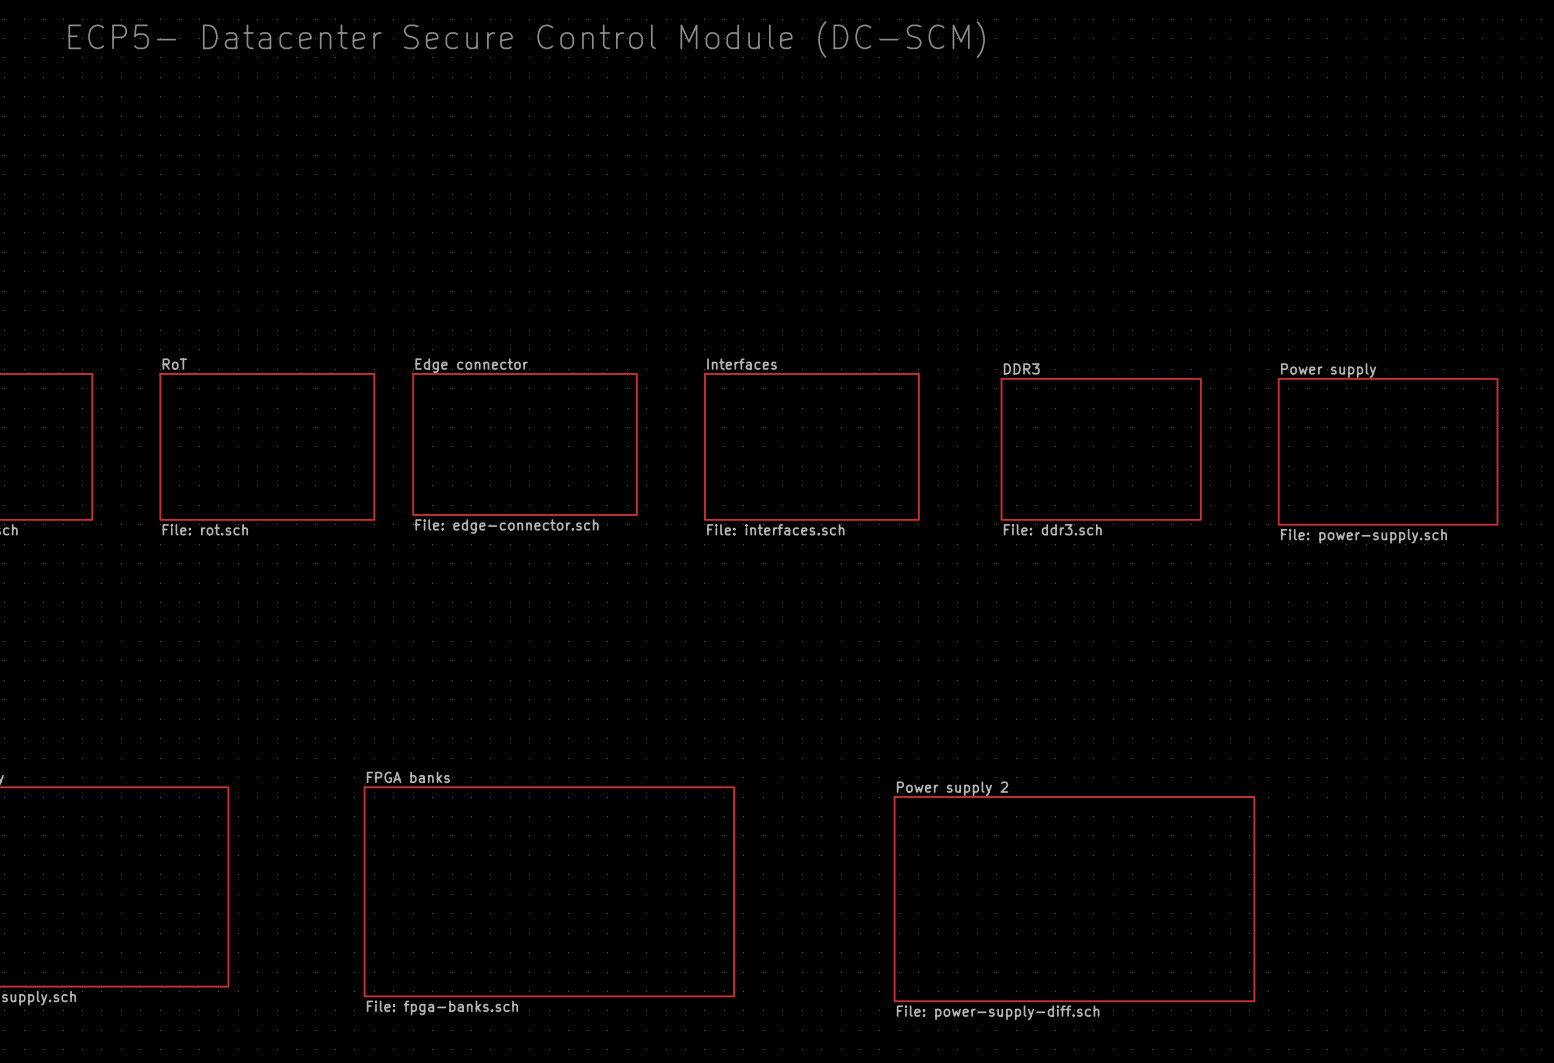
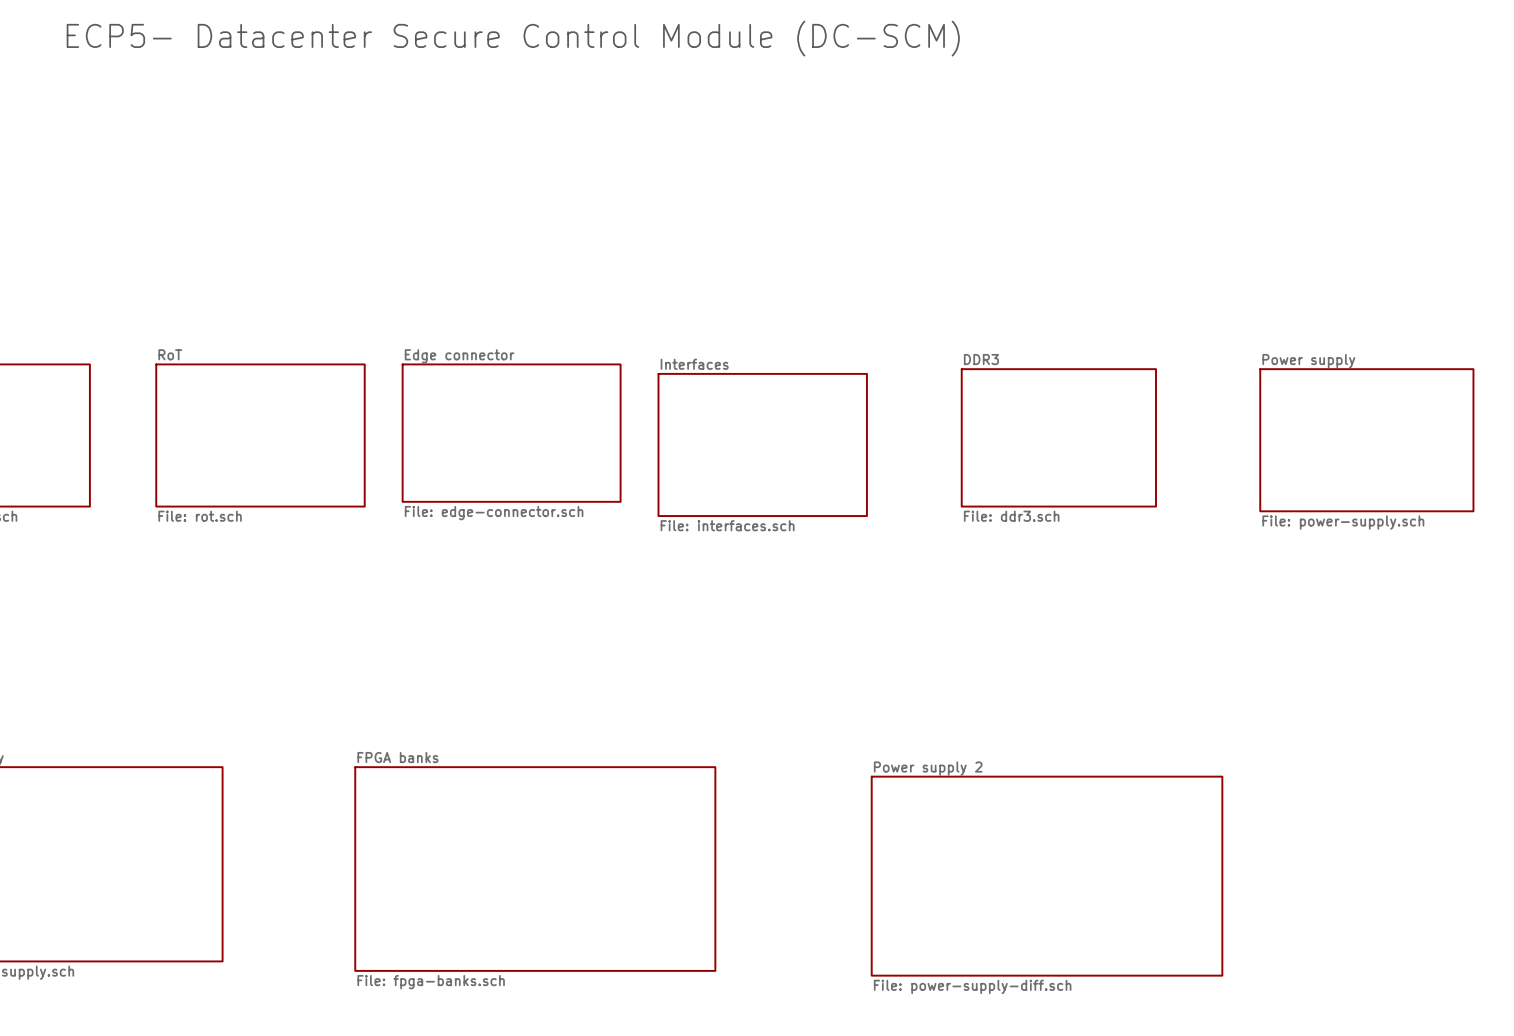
sheet Interfaces position: (811, 446) -> (762, 444)
sheet DDR3 position: (1101, 449) -> (1058, 437)
sheet Power supply position: (1388, 451) -> (1366, 440)

